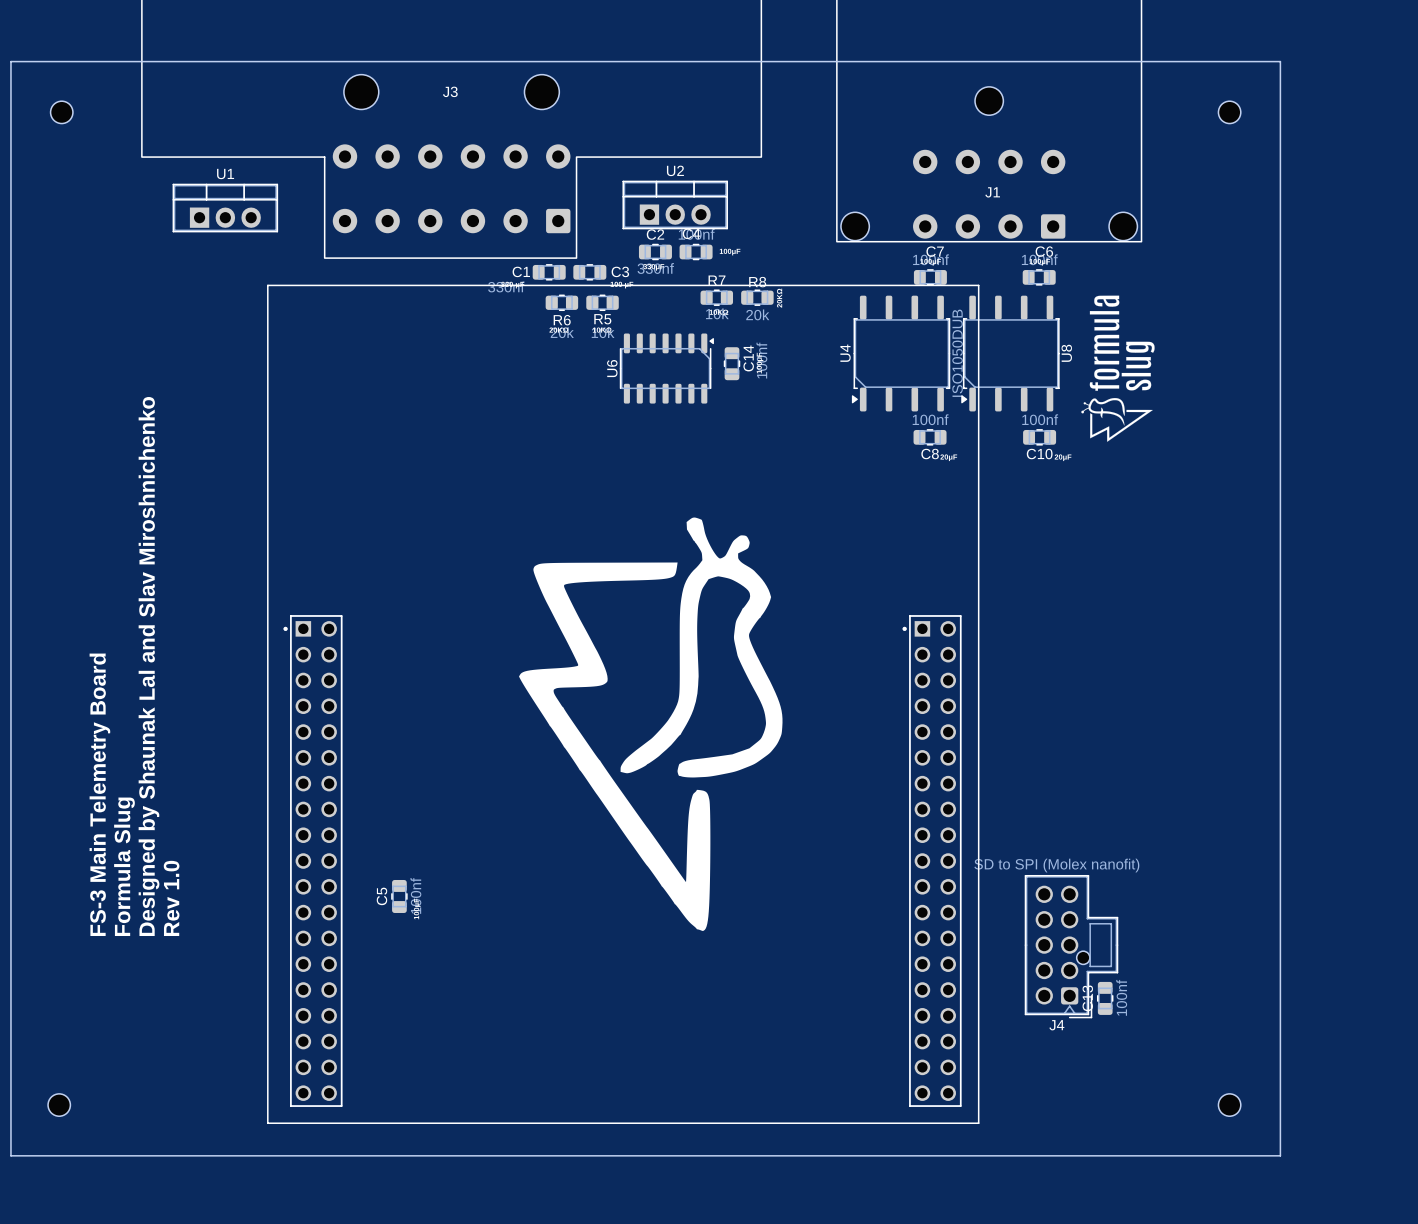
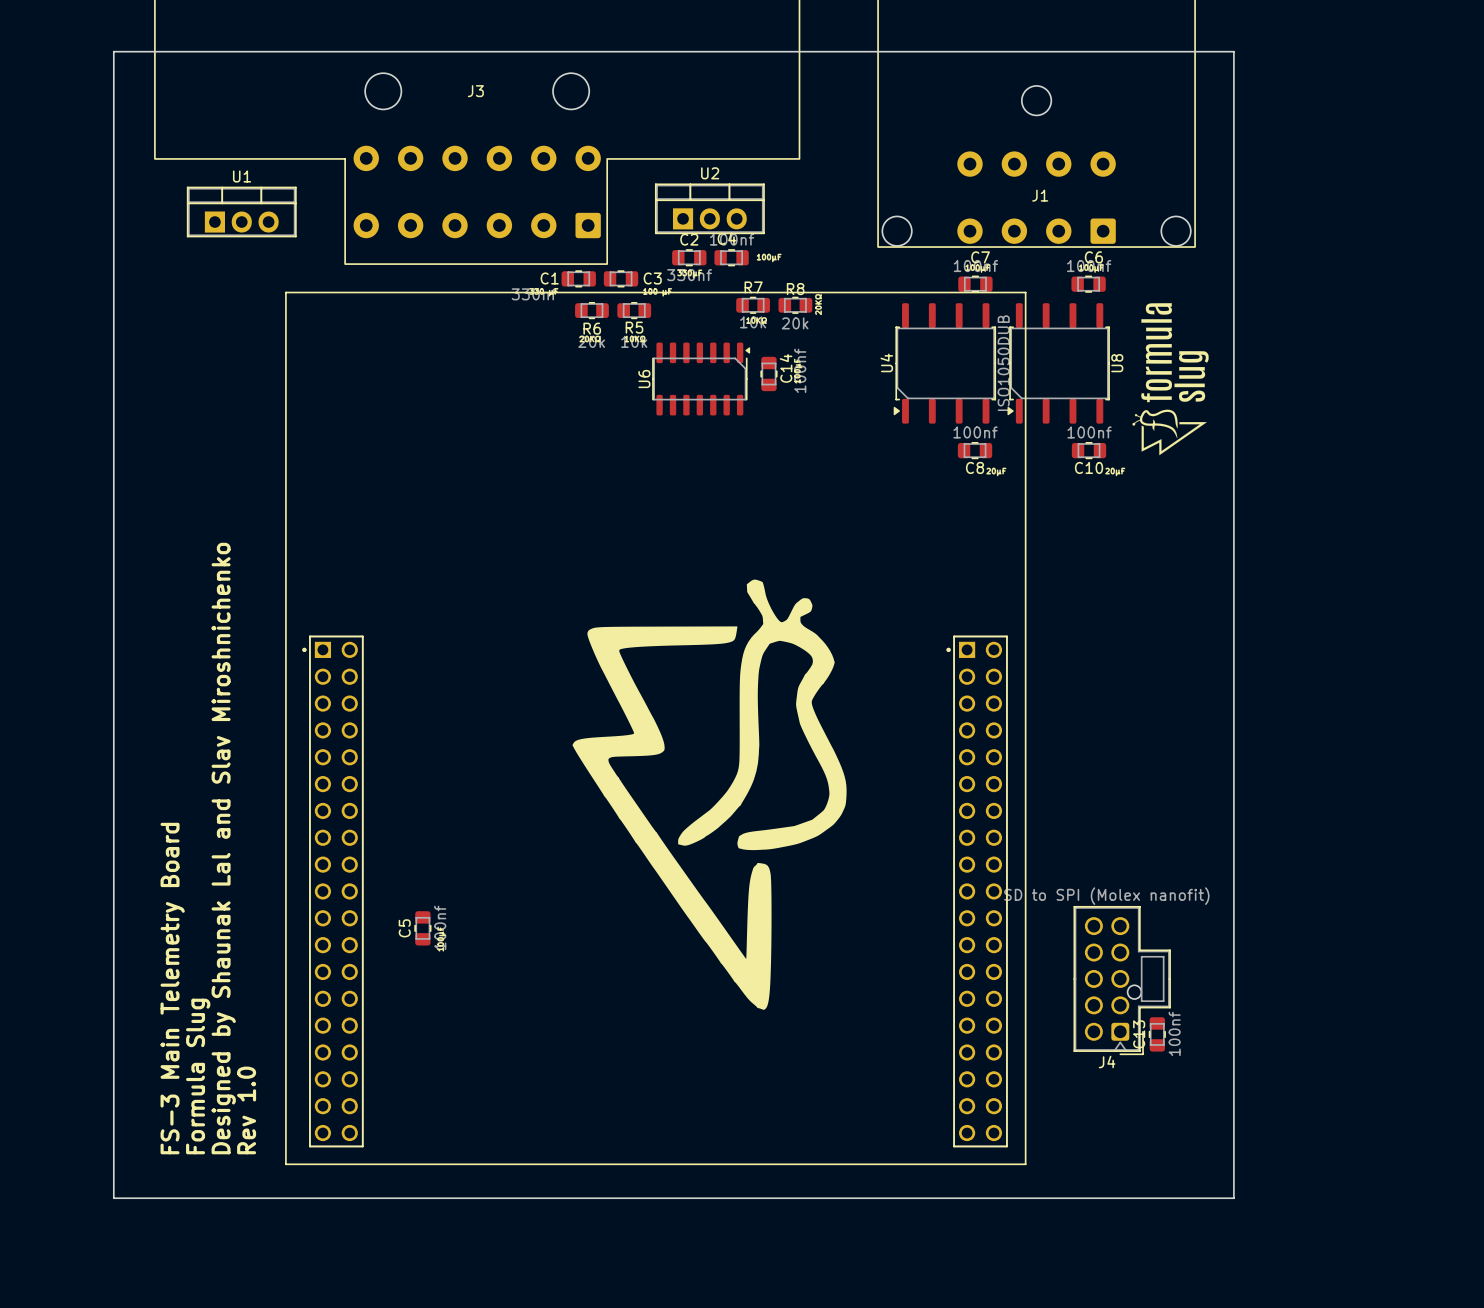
part: (61, 112) -> none
part: (1229, 112) -> none
text position: Designed by Shaunak Lal and Slav Miroshnichenko (149, 666) -> Designed by Shaunak Lal and Slav Miroshnichenko (223, 848)
drawing position: (650, 724) -> (709, 794)
text position: FS-3 Main Telemetry Board (99, 794) -> FS-3 Main Telemetry Board (172, 988)
text position: Formula Slug (124, 866) -> Formula Slug (198, 1076)
text position: Rev 1.0 (171, 898) -> Rev 1.0 (246, 1110)
part: (59, 1105) -> none
part: (1229, 1105) -> none
board edge: (102, 1155) (10, 1155) (10, 61) (1280, 61) (1280, 1155) (1178, 1155) -> (113, 1198) (113, 51) (1233, 51) (1233, 1198)

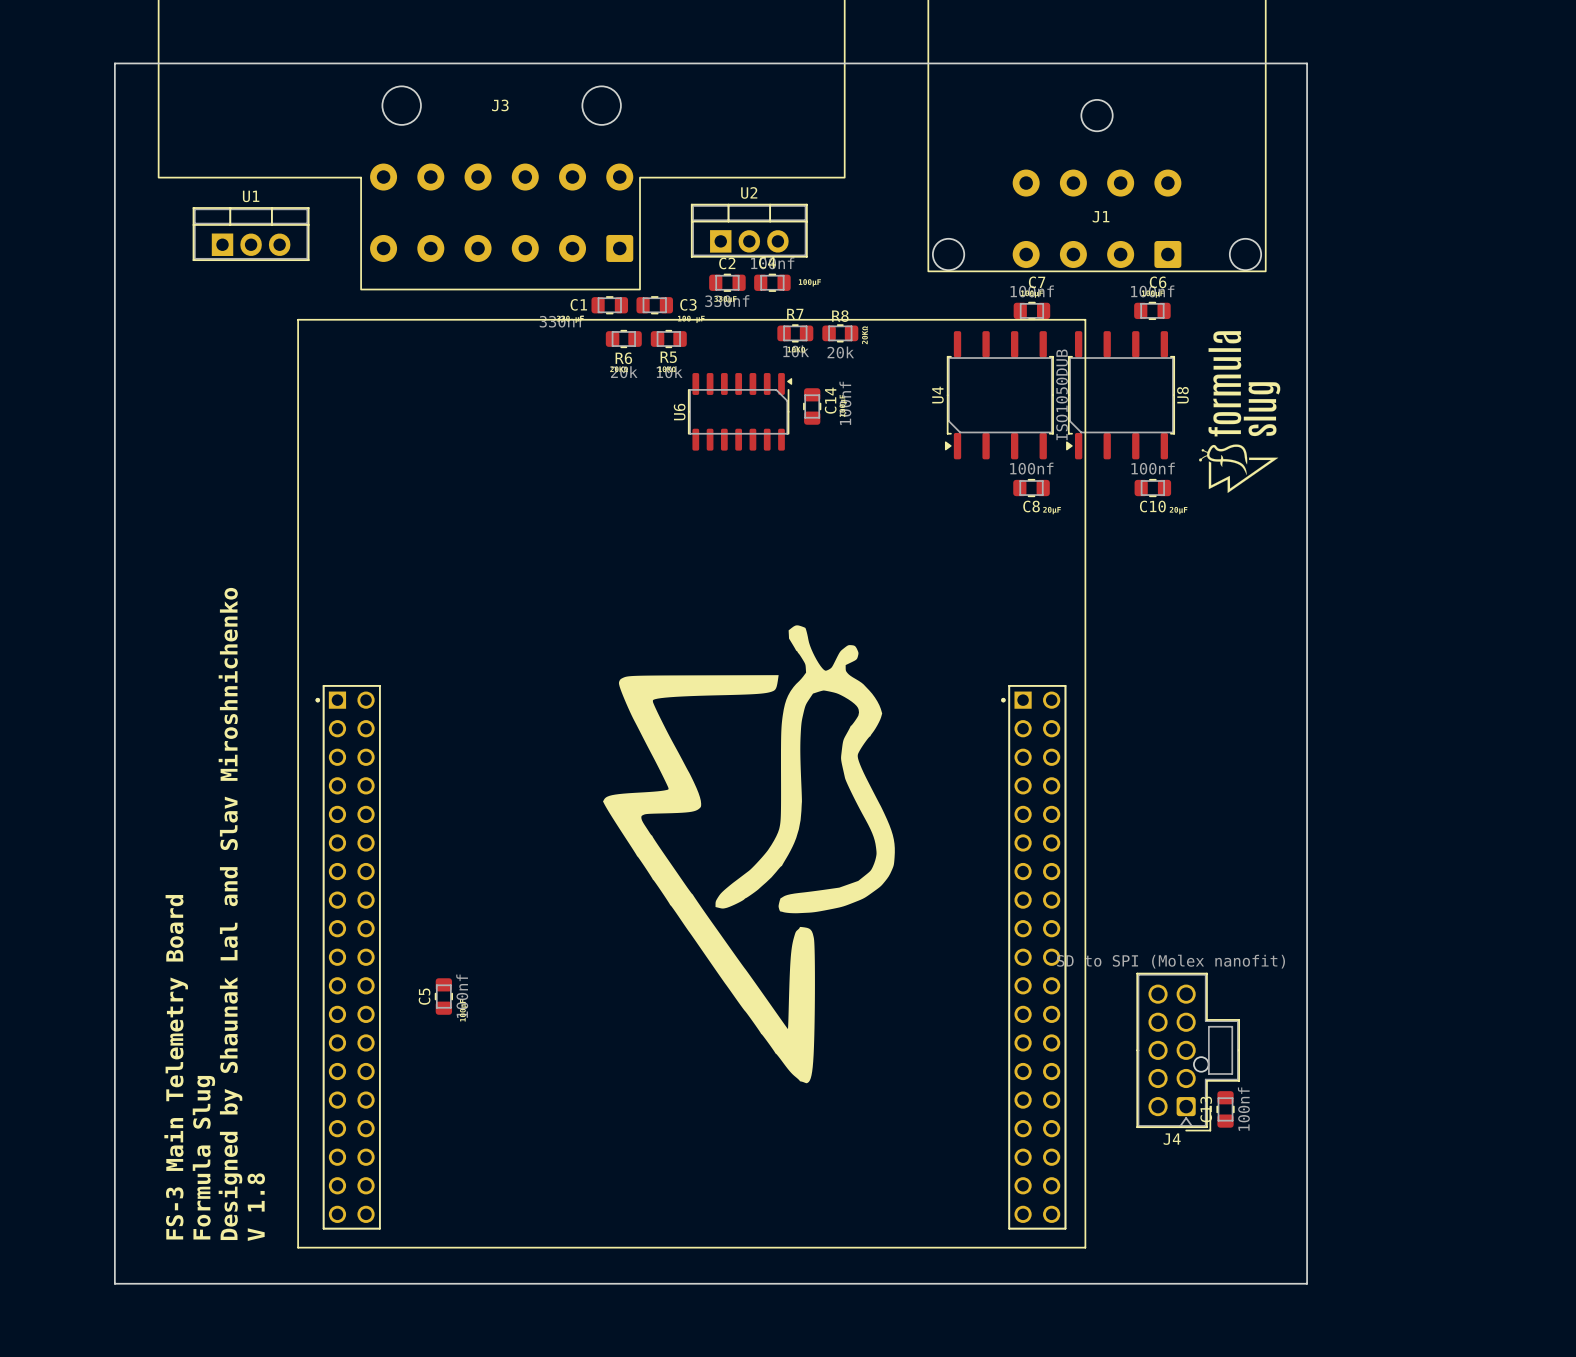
text: Rev 1.0 (246, 1110) -> V 1.8 (256, 1207)

